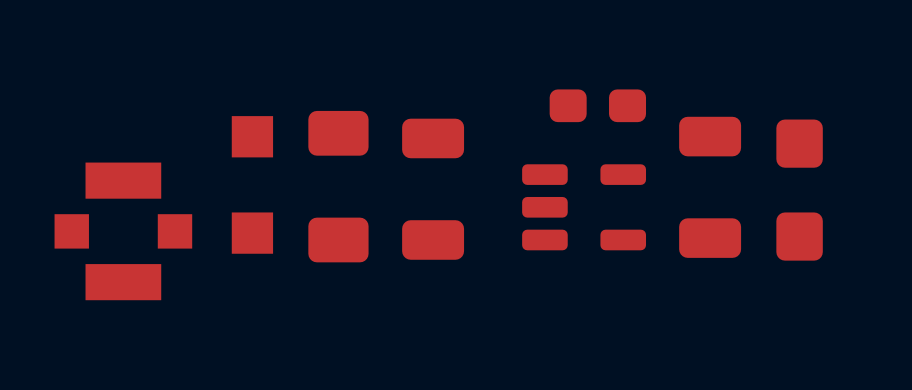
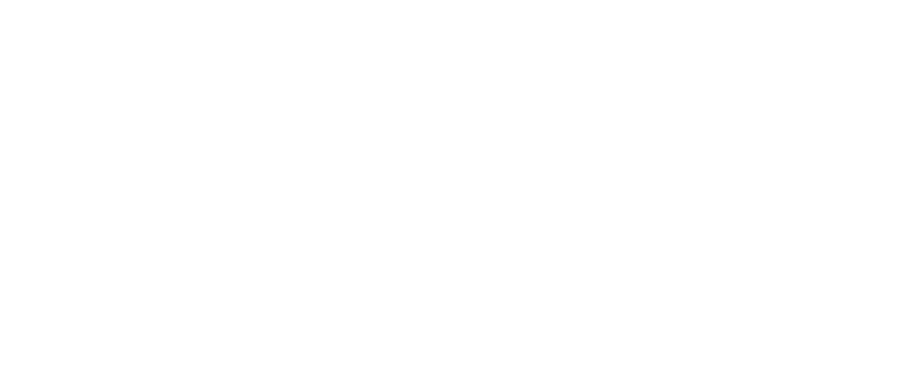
part: (597, 105) -> none
part: (252, 184) -> none
part: (338, 186) -> none
part: (710, 187) -> none
part: (433, 189) -> none
part: (799, 190) -> none
part: (584, 207) -> none
part: (123, 231) -> none

